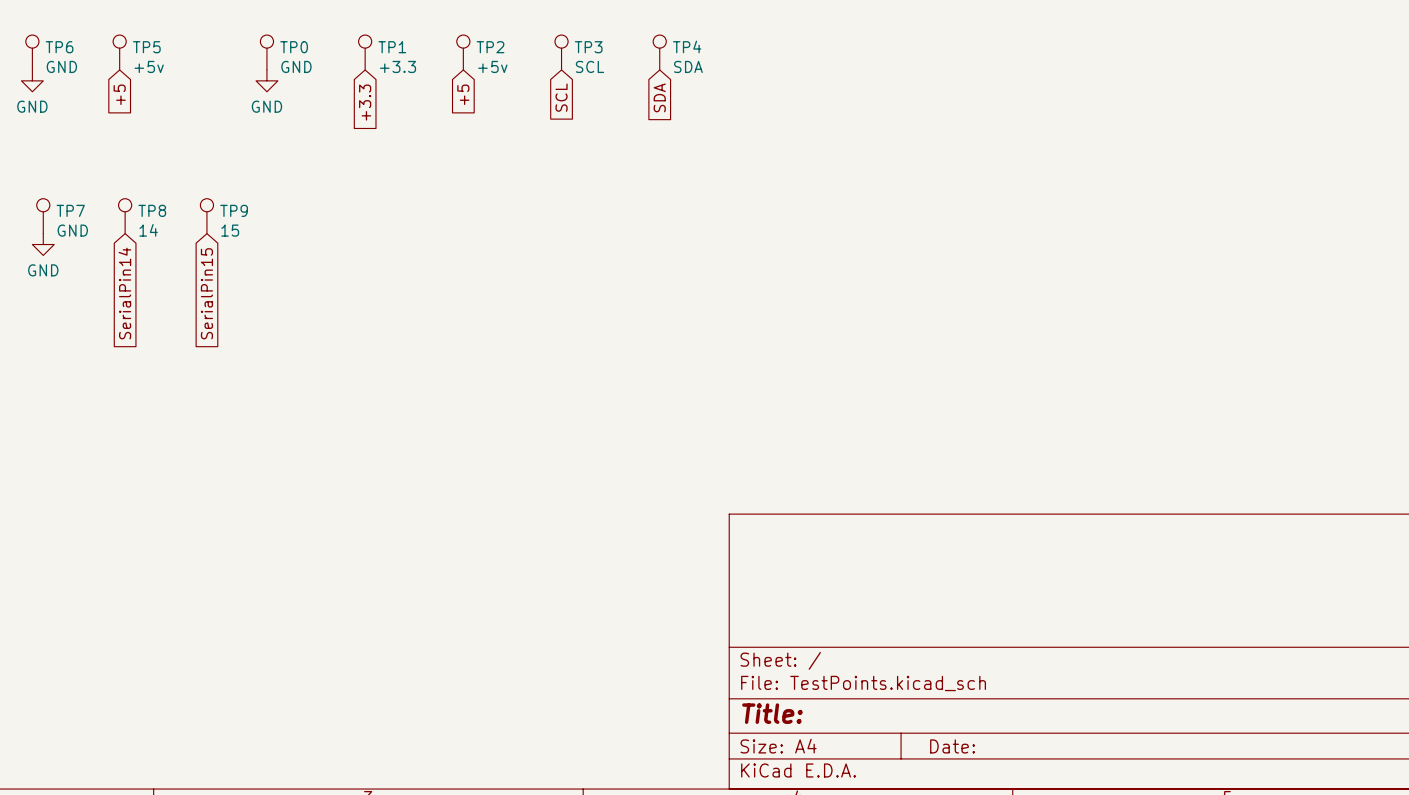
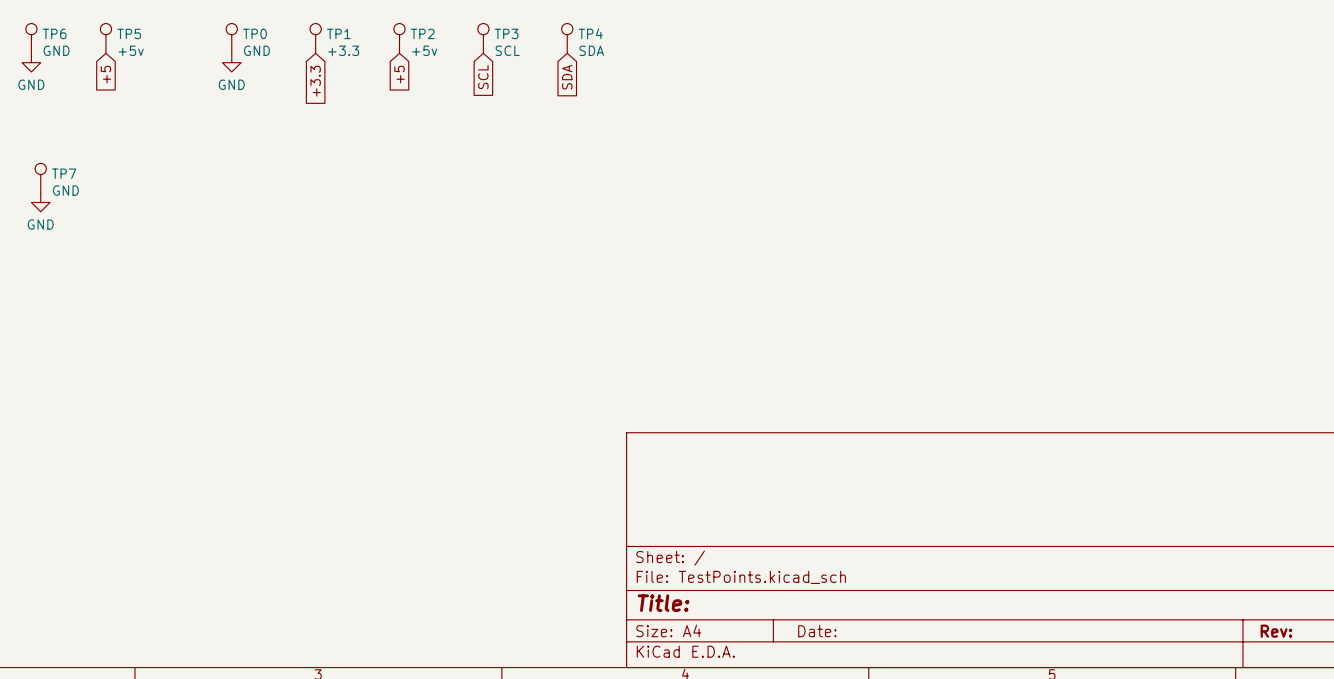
TP8: 14 (125, 216) -> none
TP9: 15 (206, 216) -> none
global label: SerialPin14 (124, 293) -> none
global label: SerialPin15 (206, 293) -> none

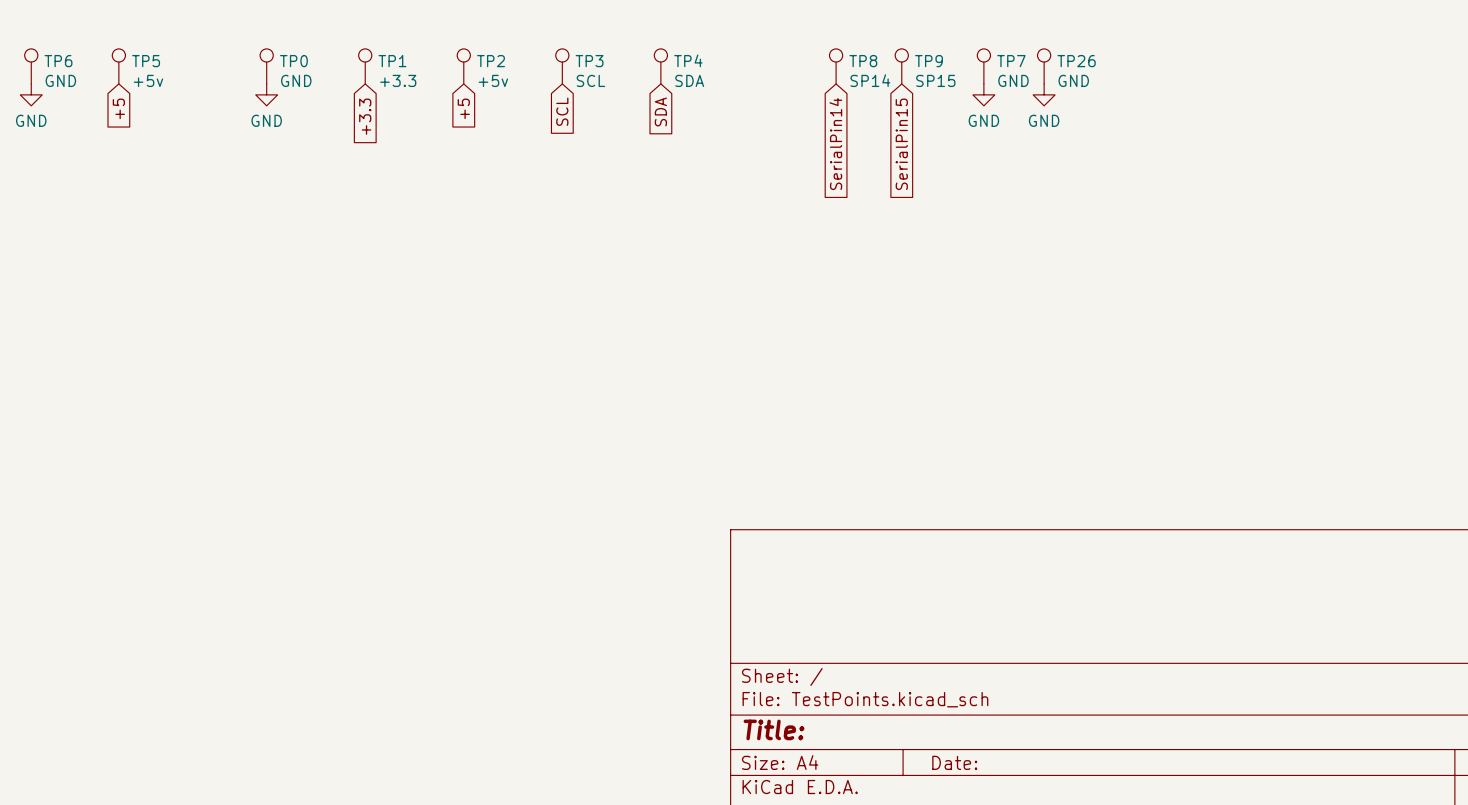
TP8: none -> SP14 (836, 66)
TP9: none -> SP15 (901, 66)
TP26: none -> GND (1044, 66)
power symbol: none -> GND (983, 94)
power symbol: none -> GND (1044, 94)
global label: none -> SerialPin14 (835, 144)
global label: none -> SerialPin15 (901, 144)
TP7 position: (40, 178) -> (983, 66)
power symbol: GND (40, 202) -> none

